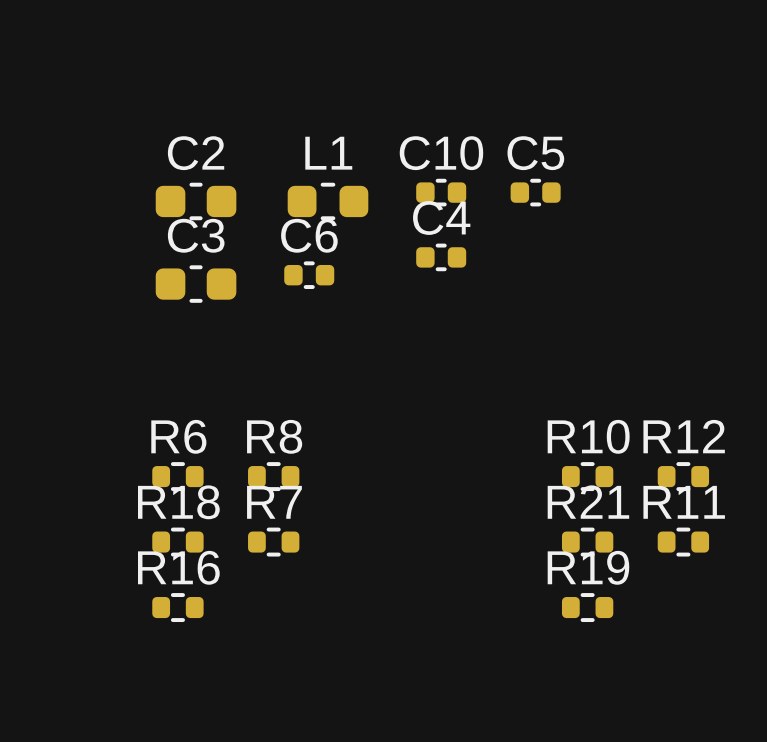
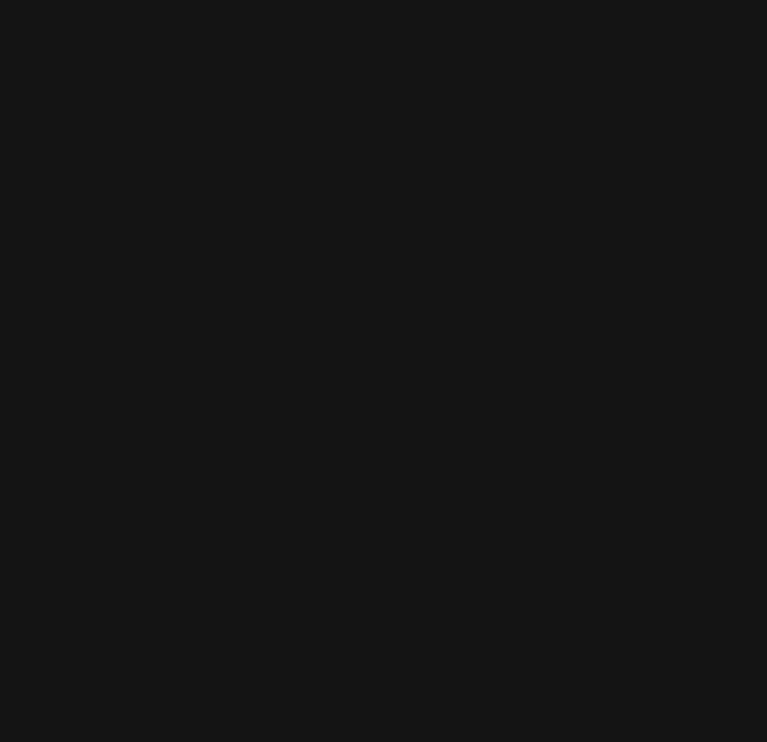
C10: (441, 192) -> none
C5: (535, 192) -> none
C2: (196, 201) -> none
L1: (327, 201) -> none
C4: (441, 257) -> none
C6: (309, 275) -> none
C3: (196, 284) -> none
R6: (177, 476) -> none
R8: (273, 476) -> none
R10: (587, 476) -> none
R12: (683, 476) -> none
R18: (177, 542) -> none
R7: (273, 542) -> none
R21: (587, 542) -> none
R11: (683, 542) -> none
R16: (177, 607) -> none
R19: (587, 607) -> none

